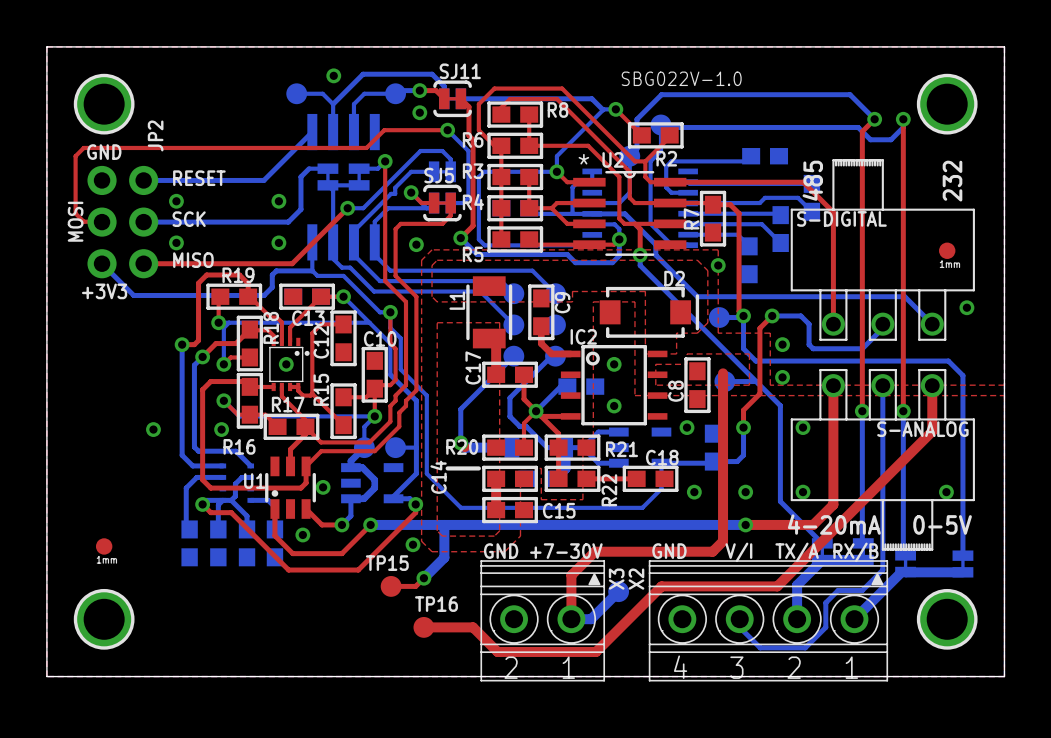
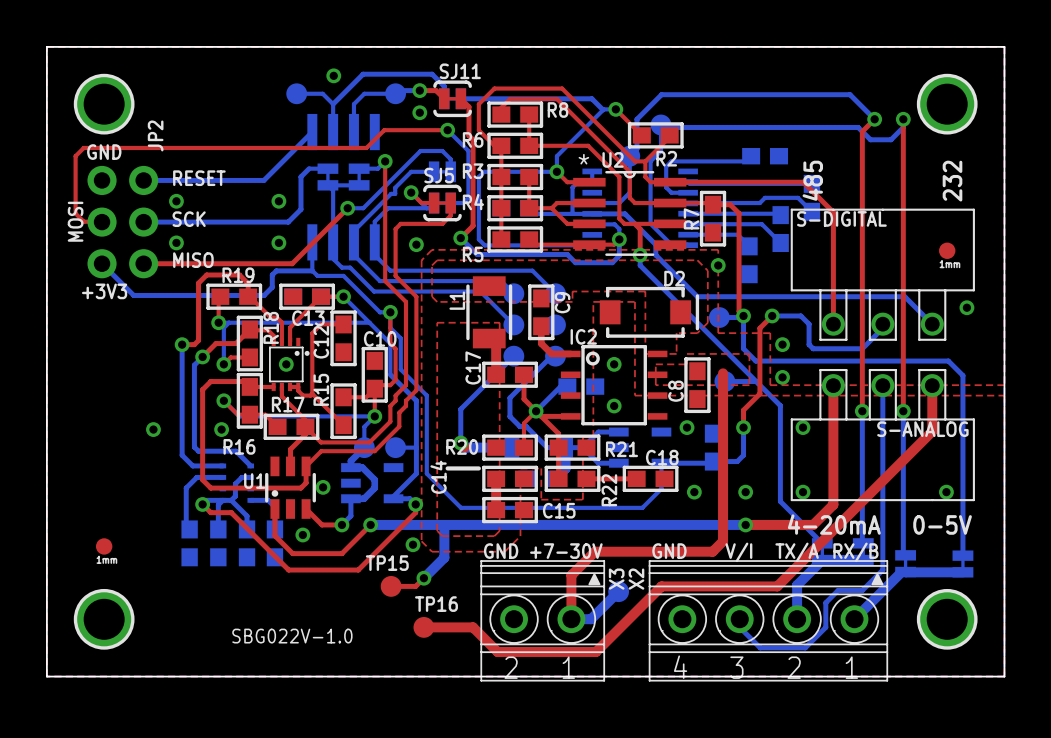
text: SBG022V-1.0 (681, 78) -> none
S-DIGITAL: (882, 250) -> none
S-DIGITAL: none -> (882, 274)
S-ANALOG: none -> (882, 435)
S-ANALOG: (882, 459) -> none
text: none -> SBG022V-1.0 (292, 636)

